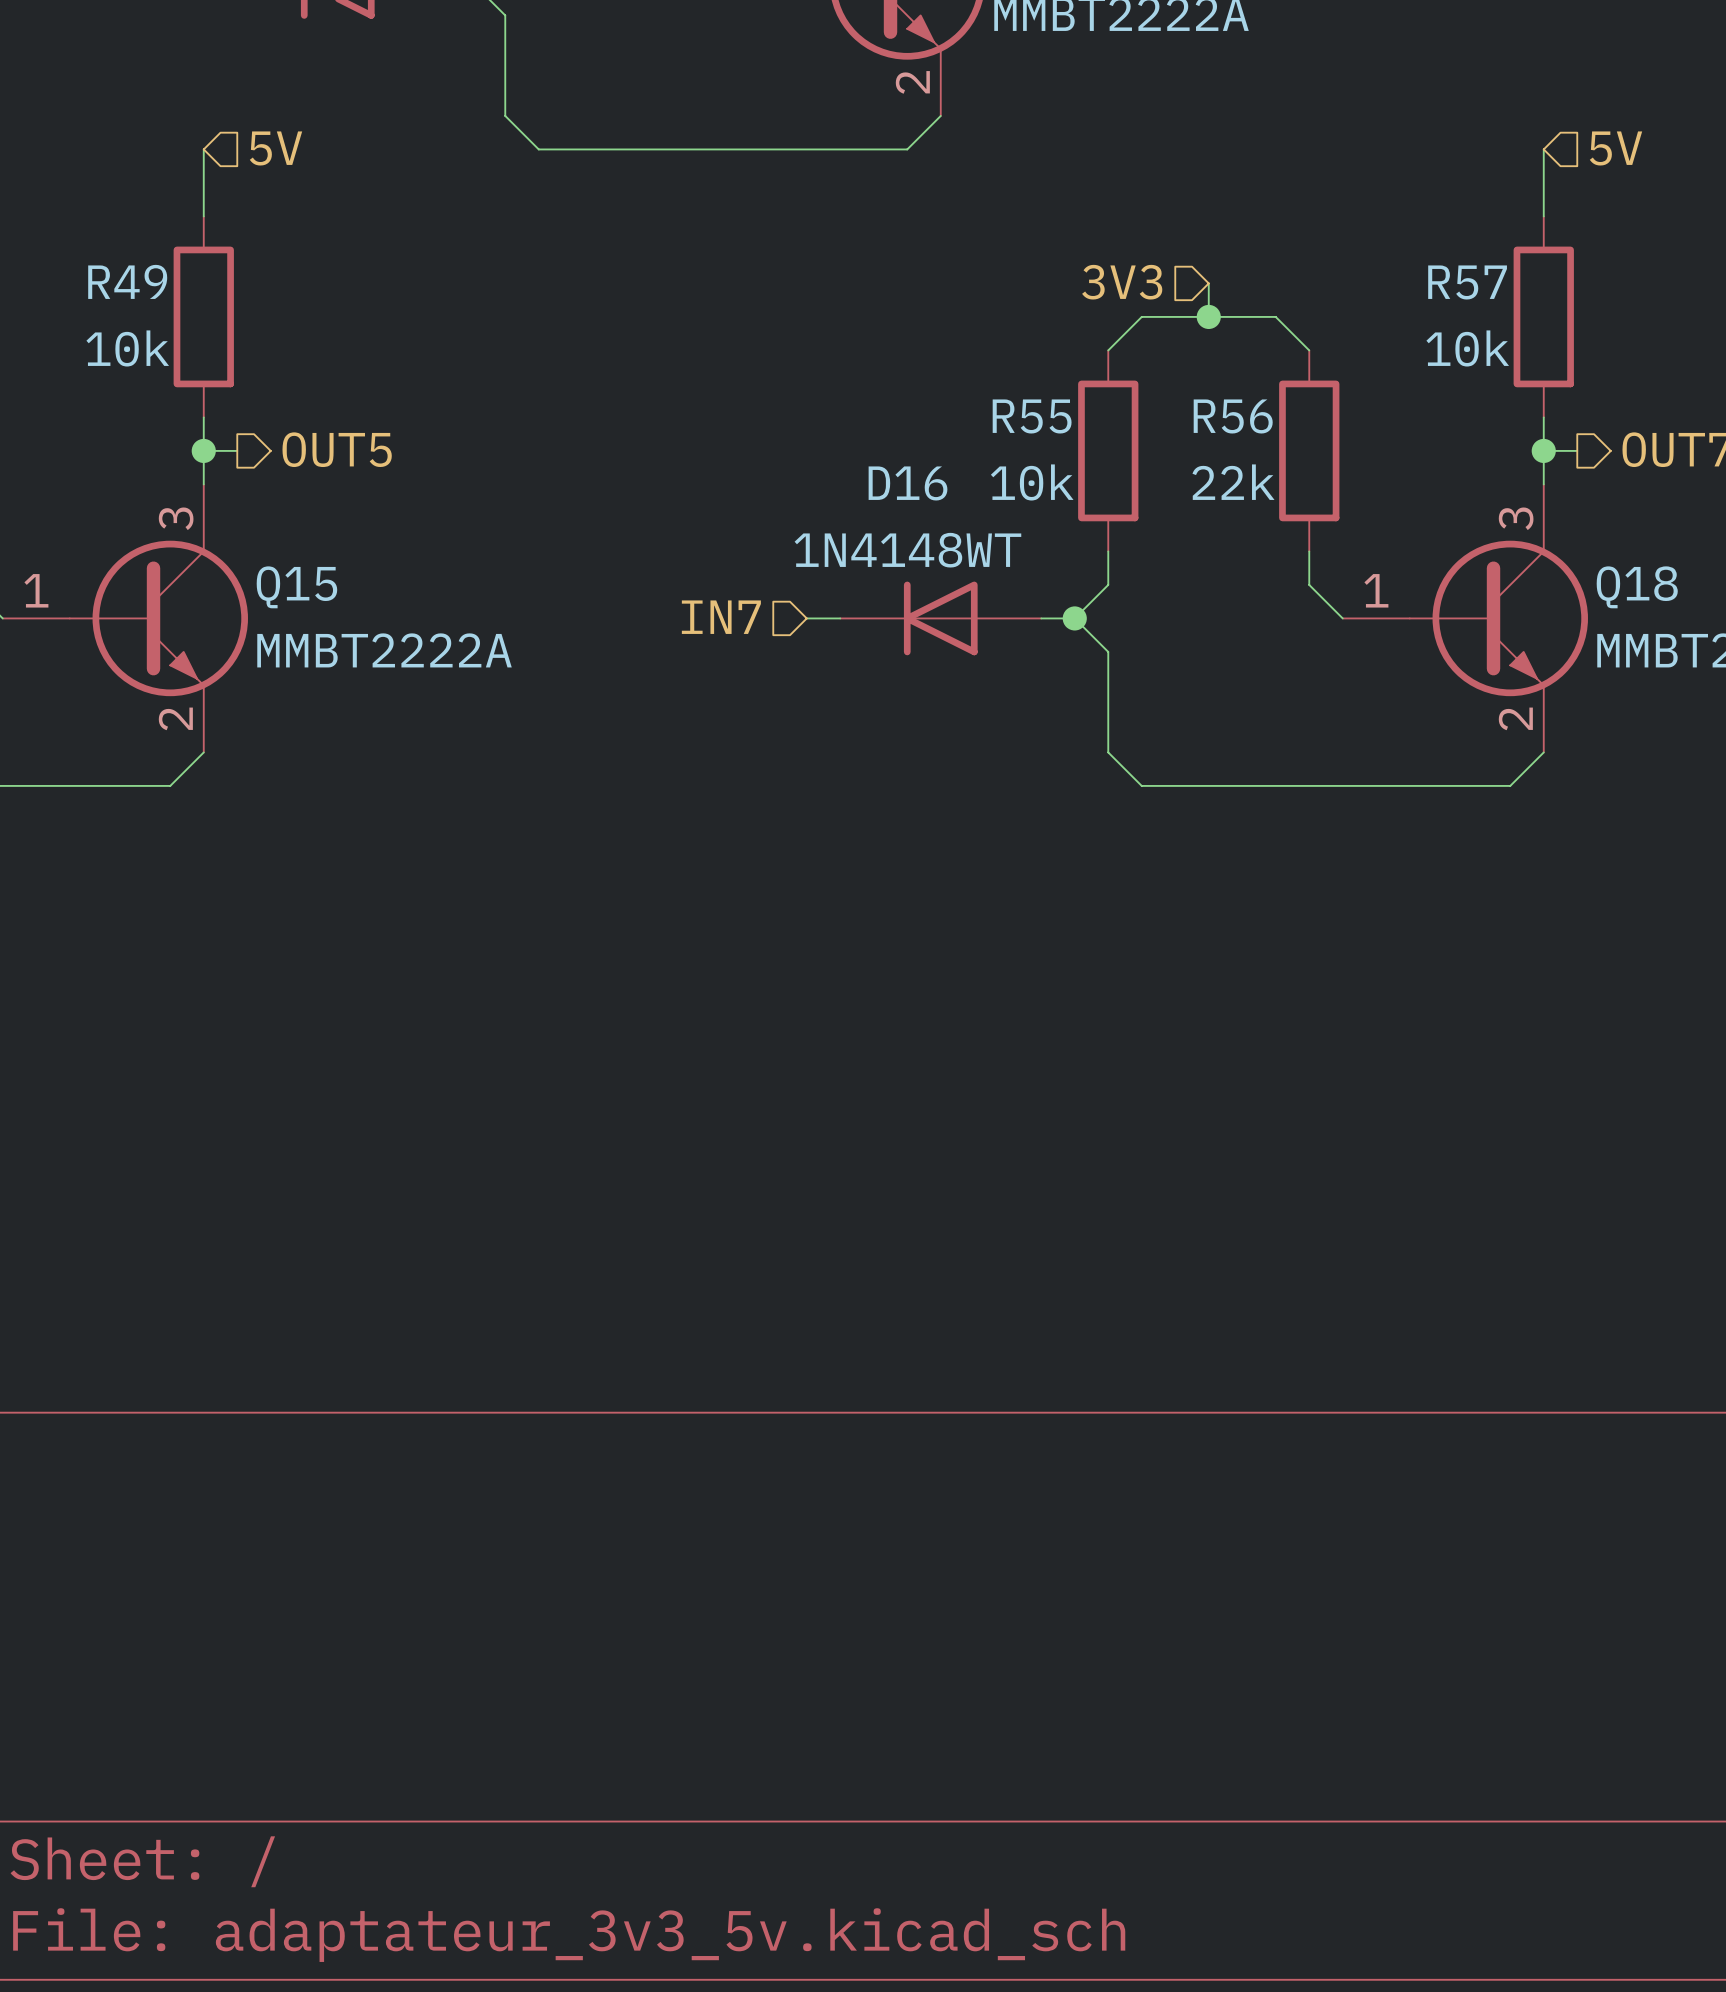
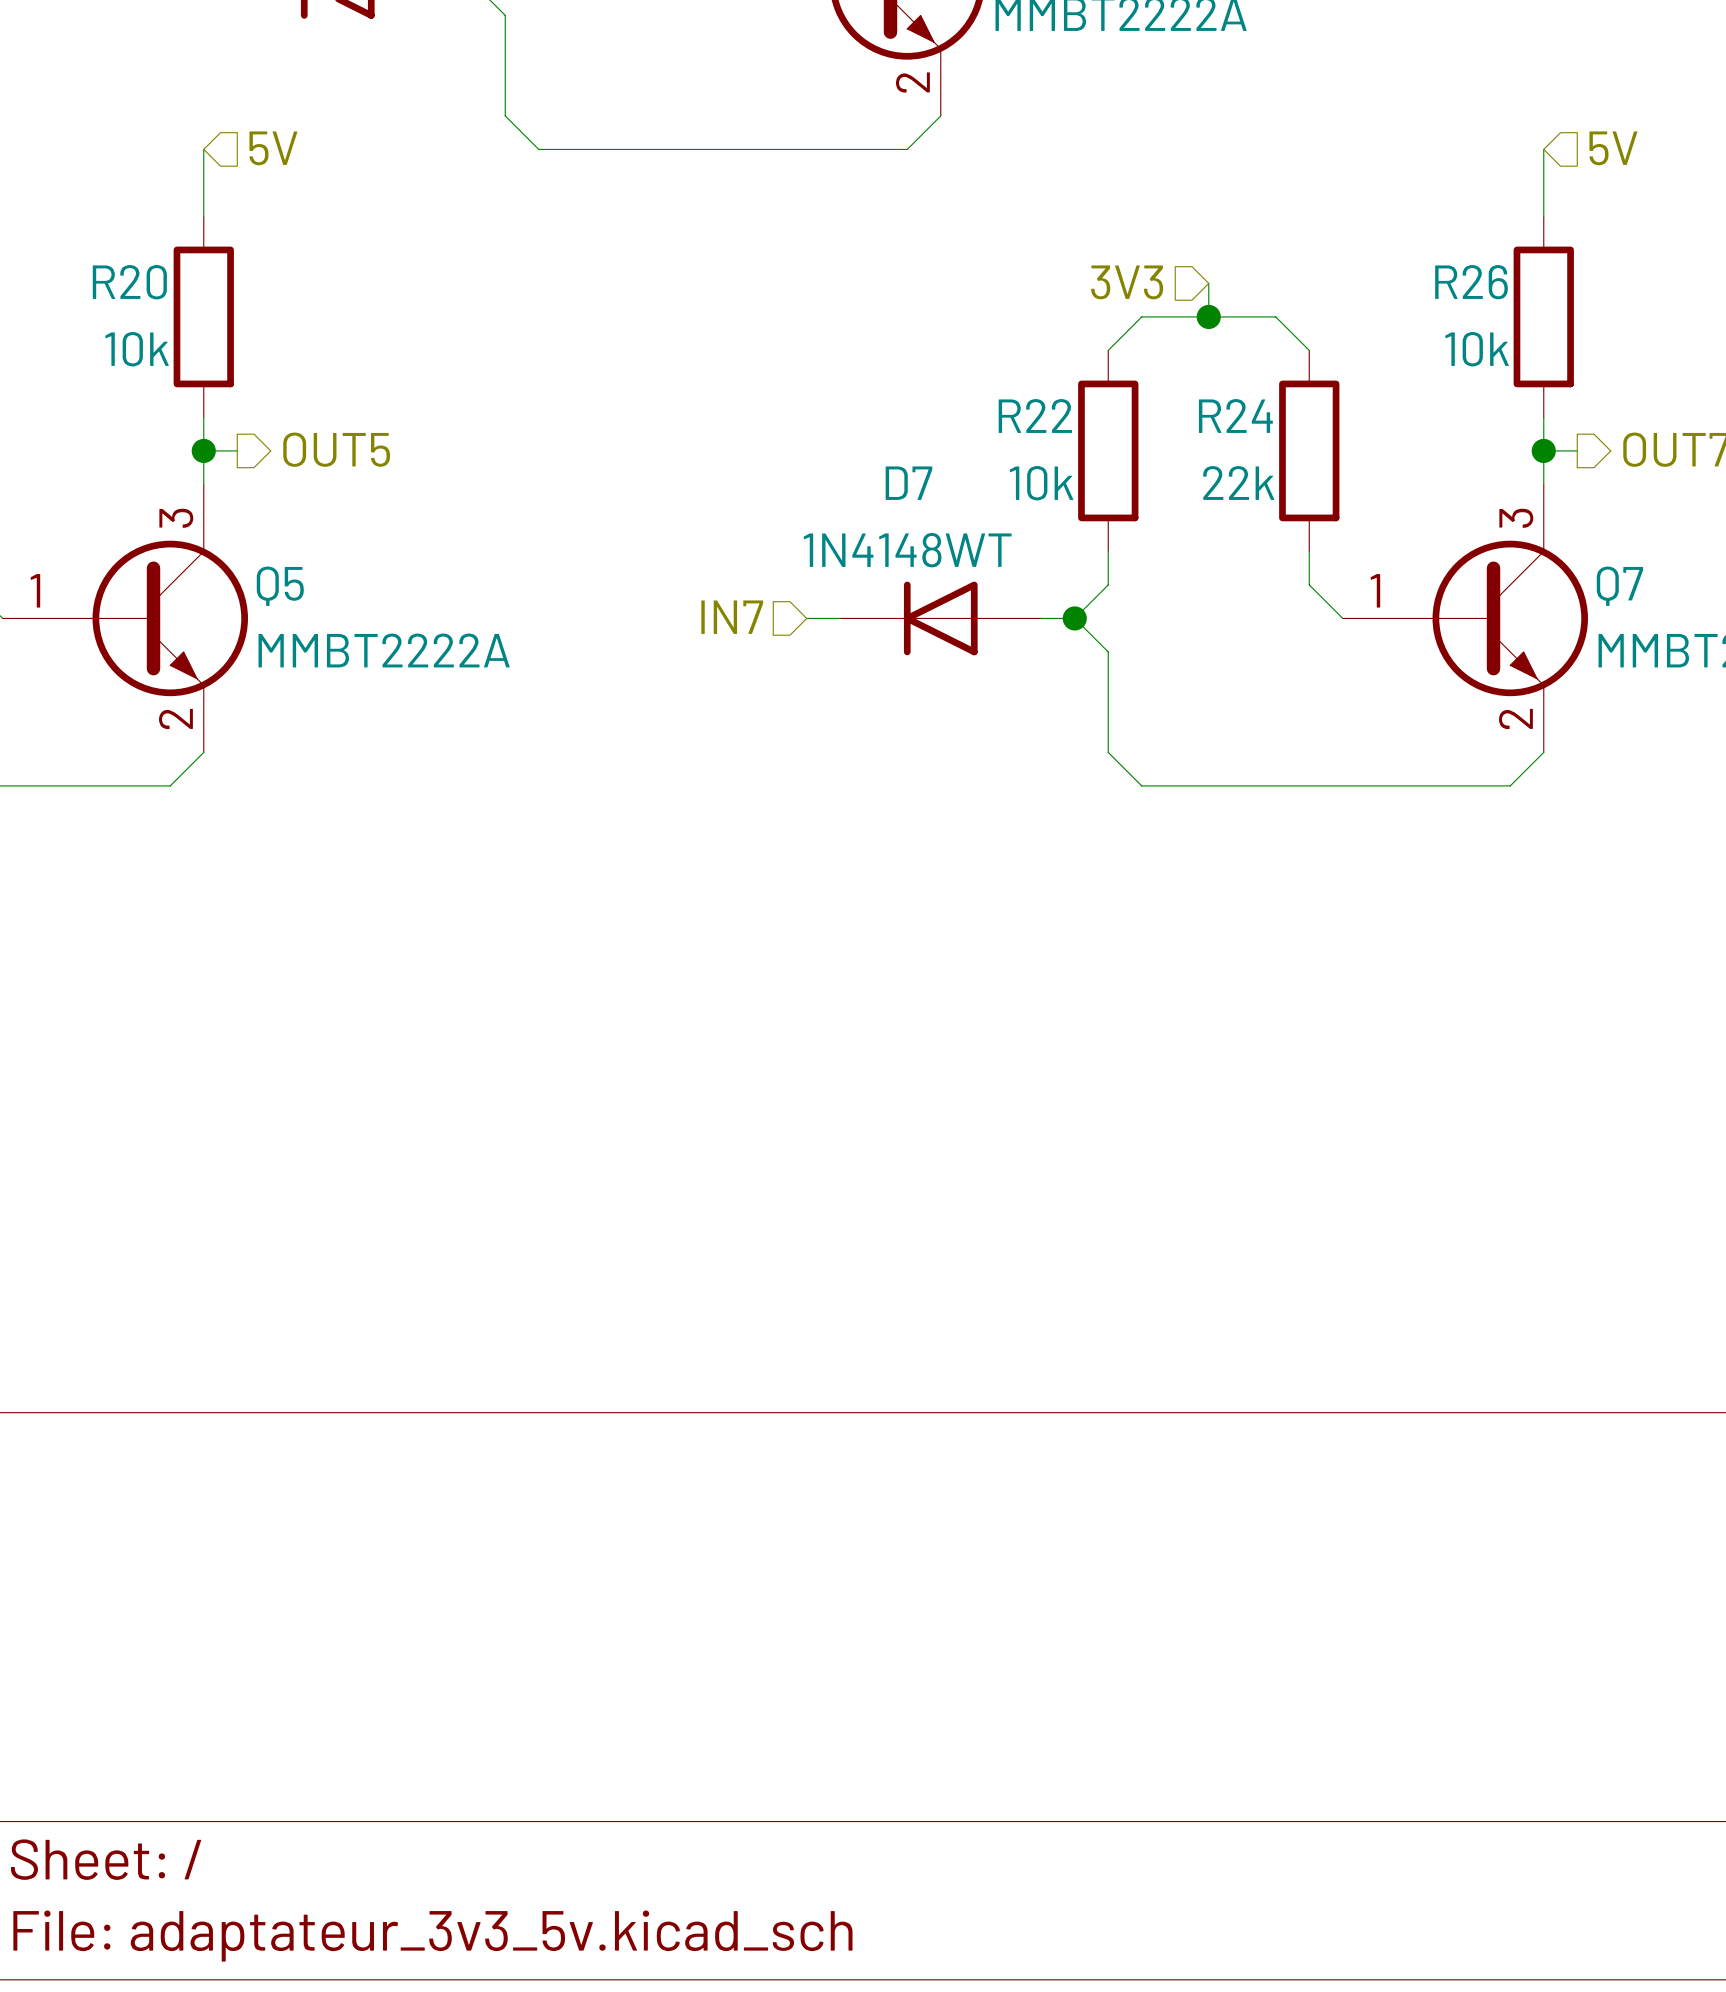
R49 name: R49 (127, 281) -> R20 (129, 282)
R57 name: R57 (1467, 282) -> R26 (1471, 282)
R55 name: R55 (1032, 416) -> R22 (1035, 415)
R56 name: R56 (1233, 416) -> R24 (1235, 415)
D16 name: D16 (908, 483) -> D7 (908, 483)
Q15 name: Q15 (296, 587) -> Q5 (280, 586)
Q18 name: Q18 (1637, 587) -> Q7 (1619, 586)

